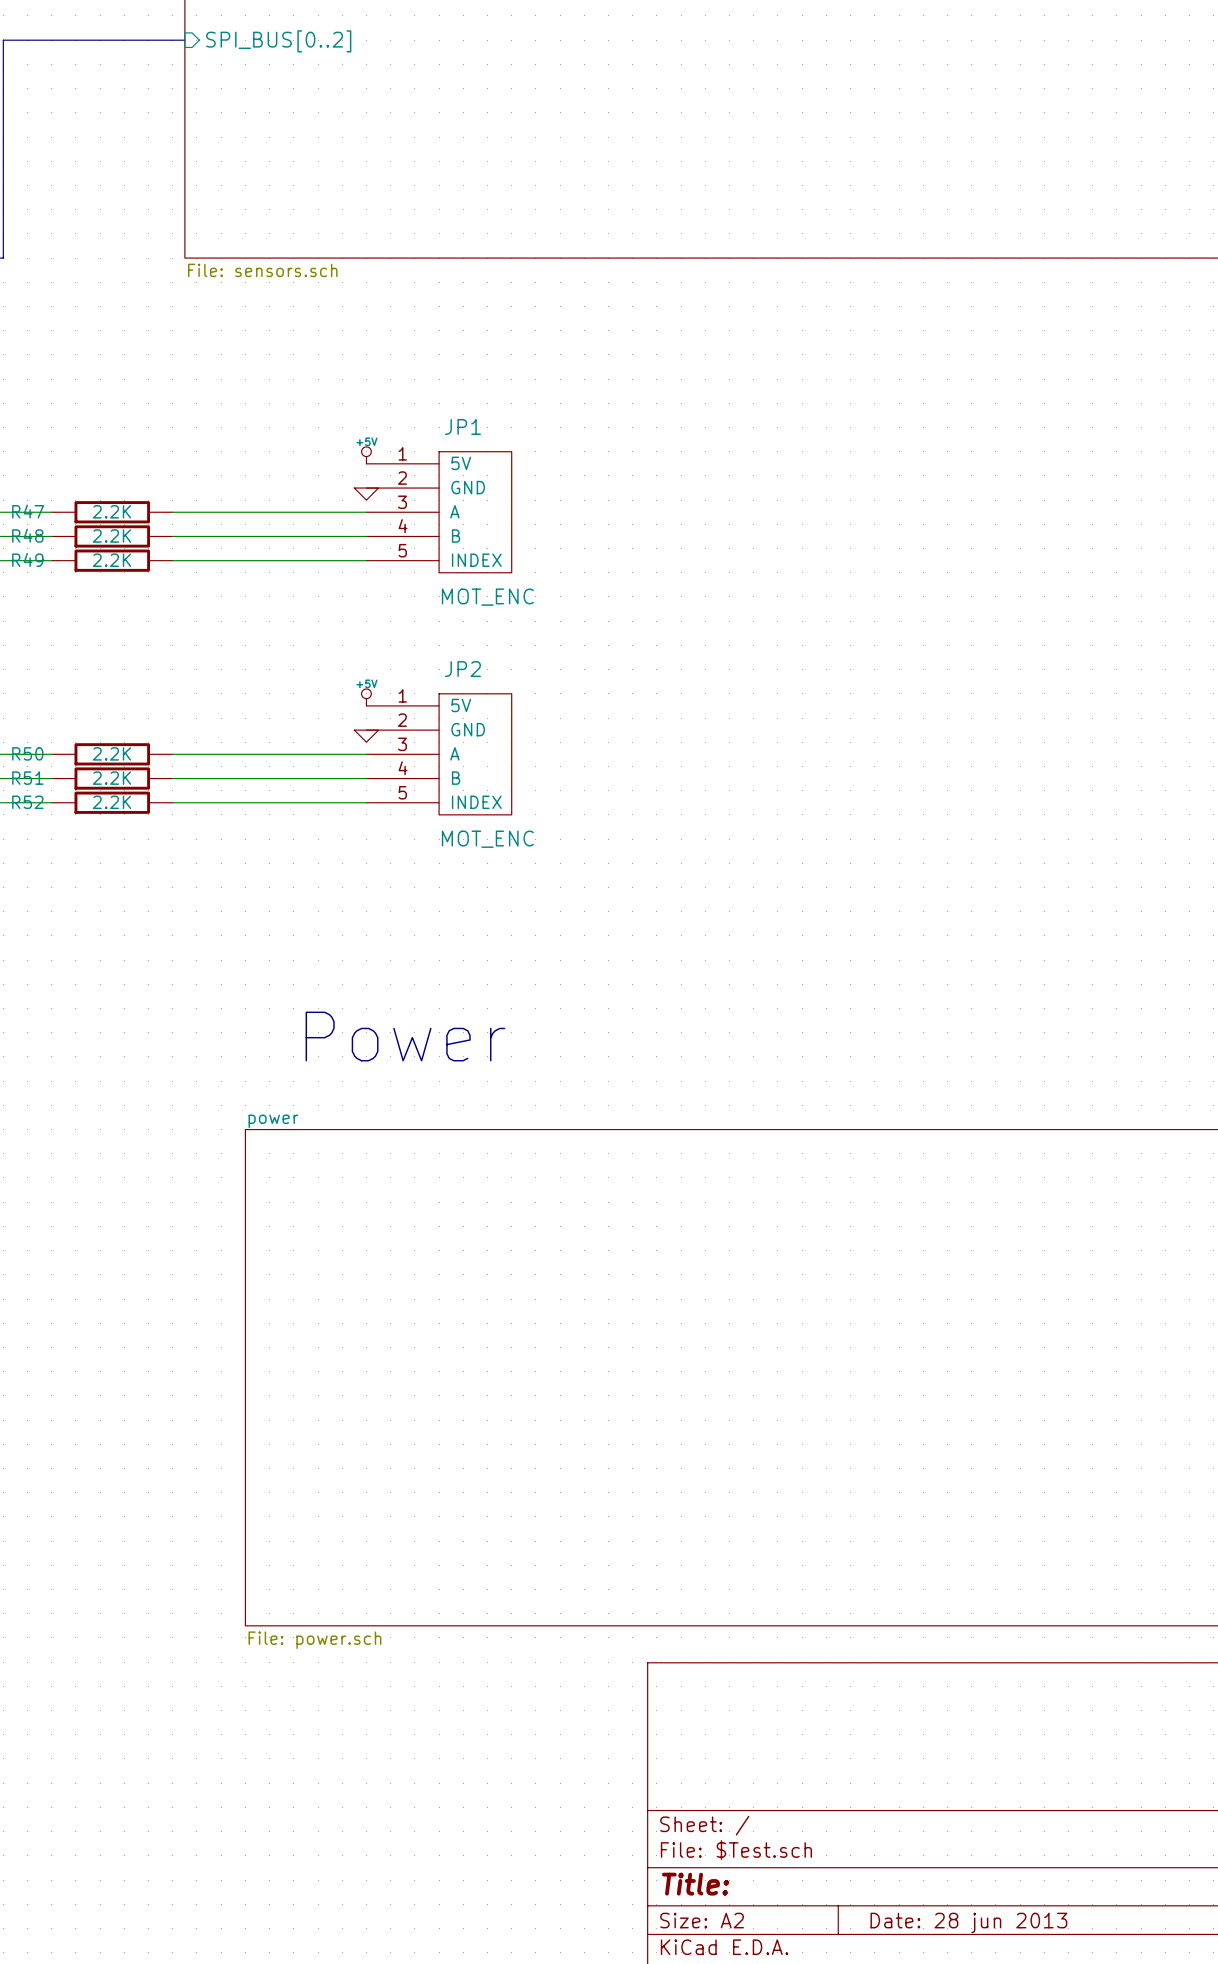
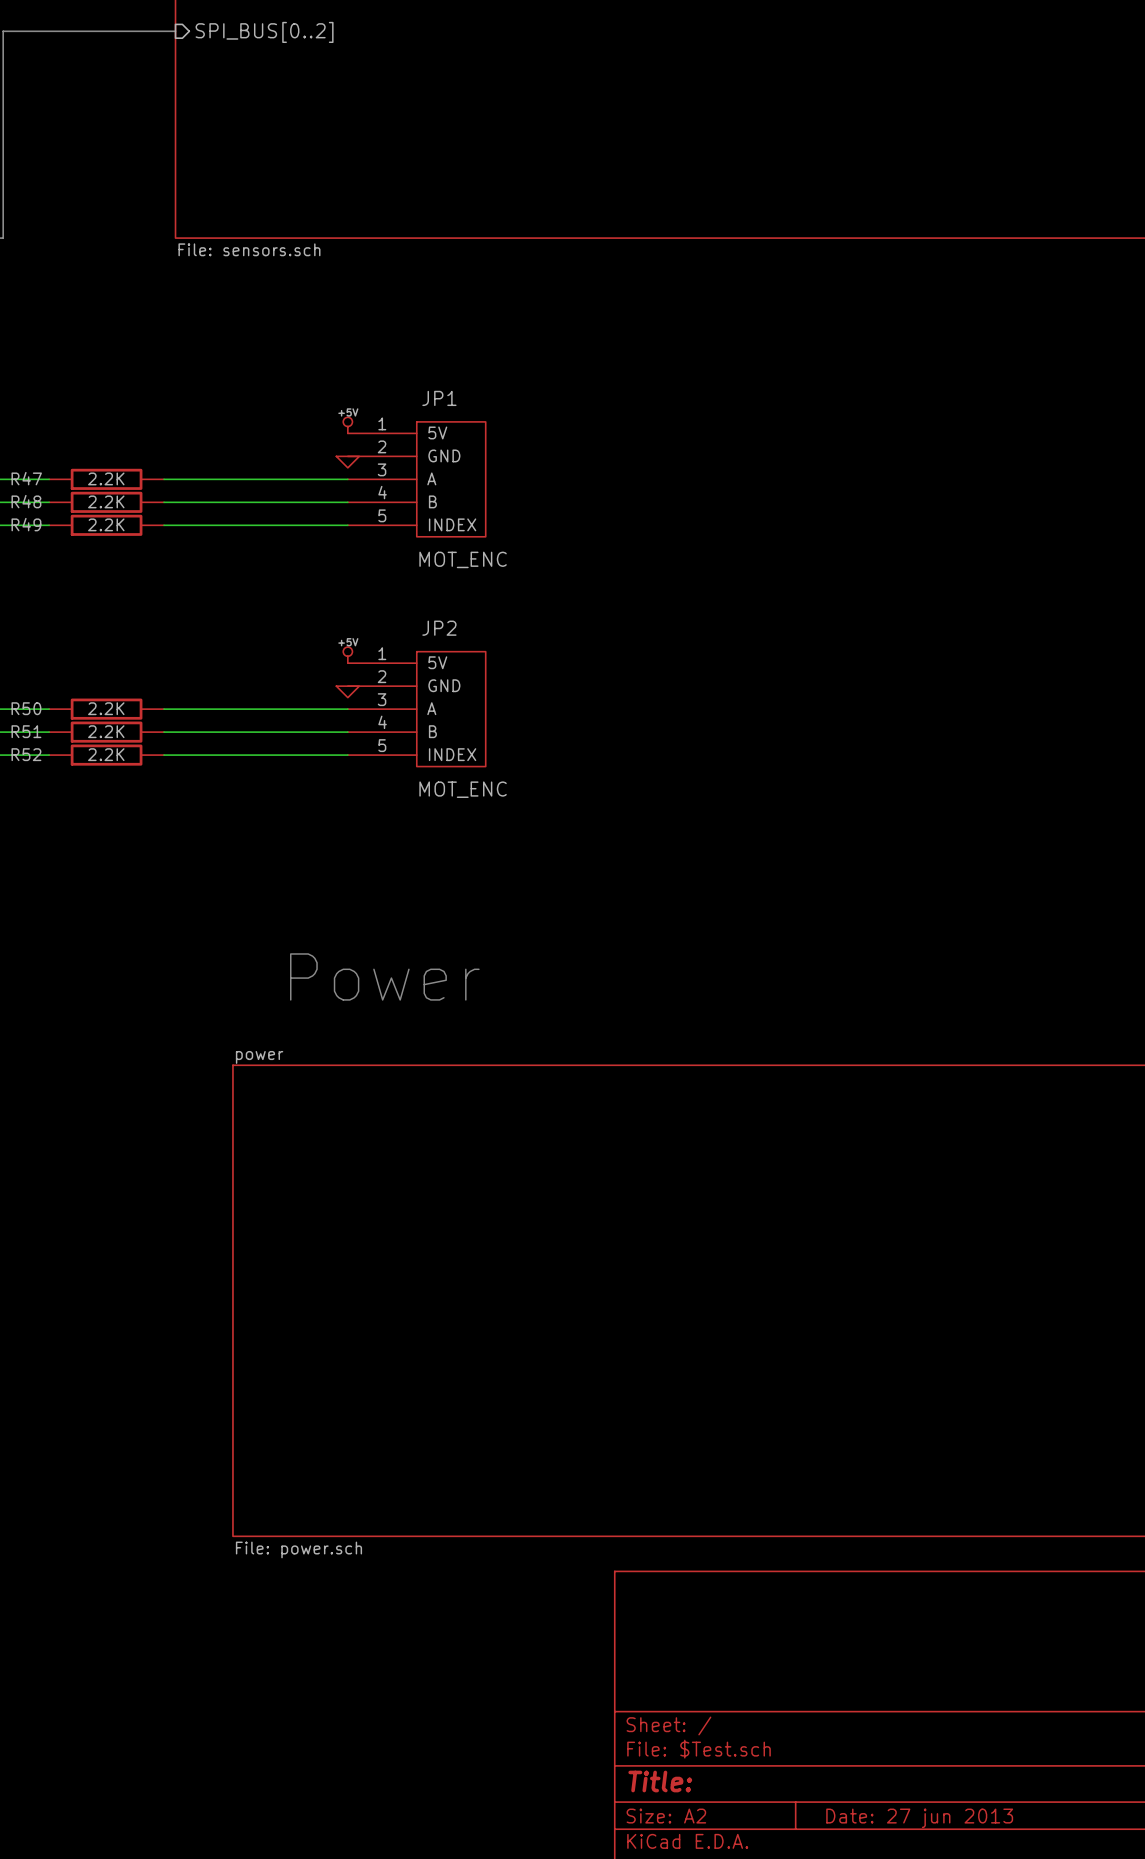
title block: Date: 28 jun 2013 (968, 1922) -> Date: 27 jun 2013 (919, 1818)

